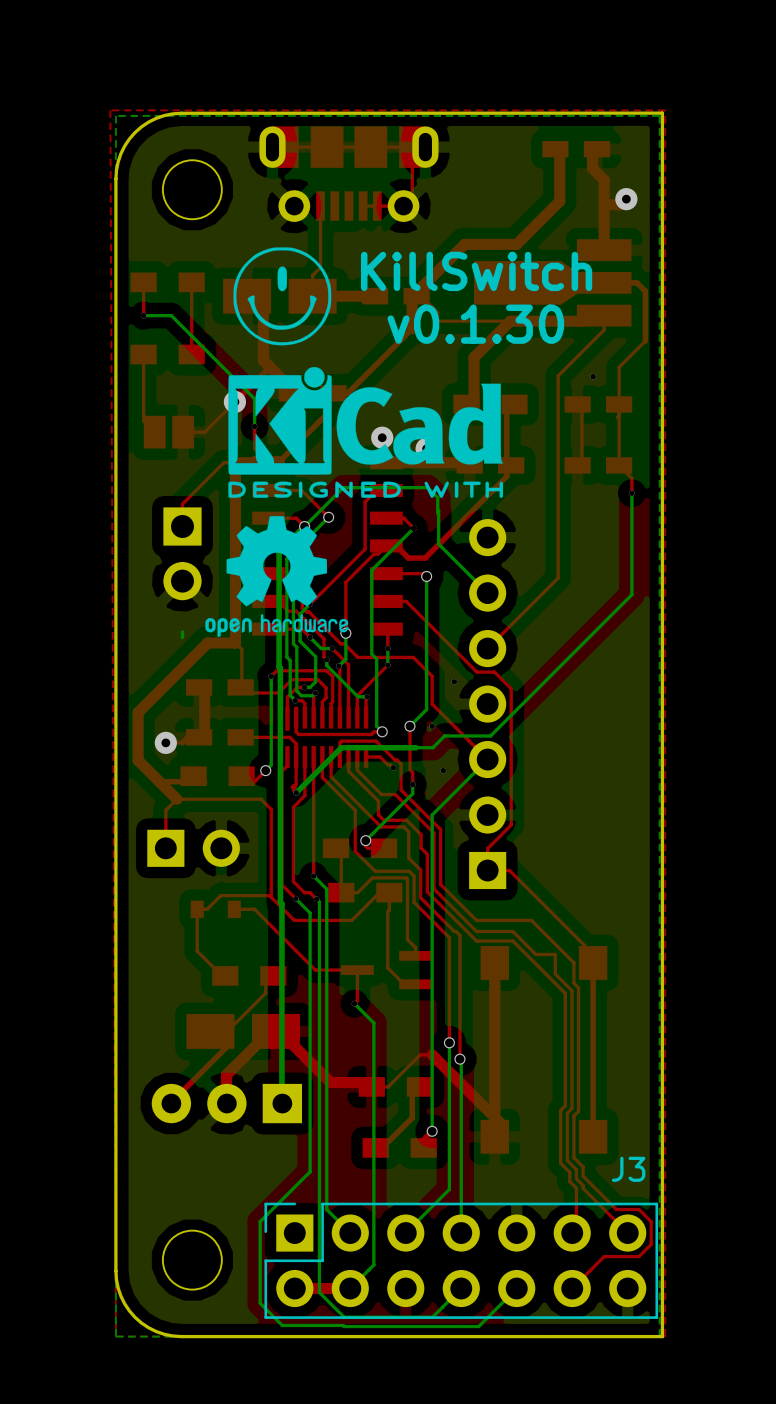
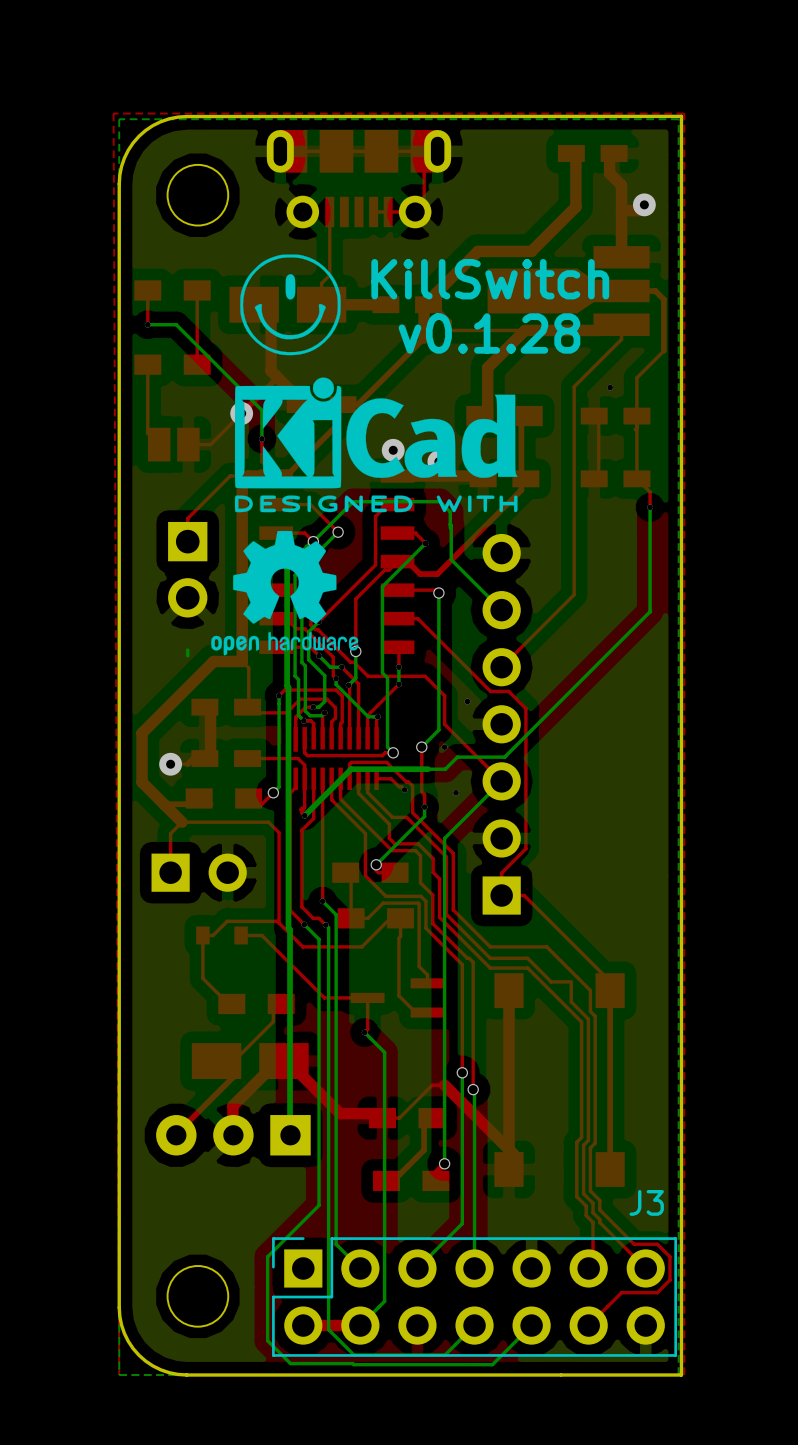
text: v0.1.30 (475, 324) -> v0.1.28 (489, 333)

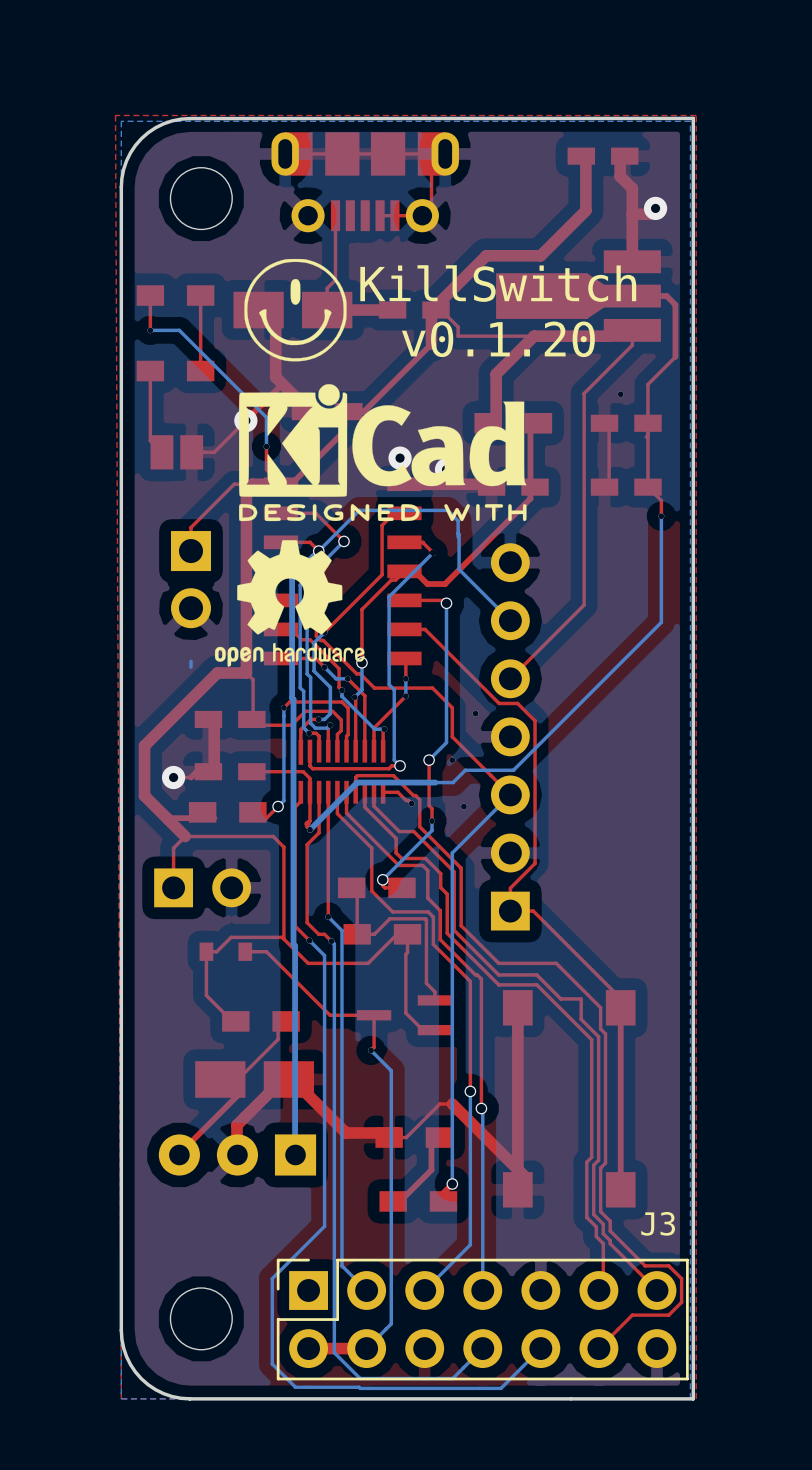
text: v0.1.28 (489, 333) -> v0.1.20 (498, 339)

